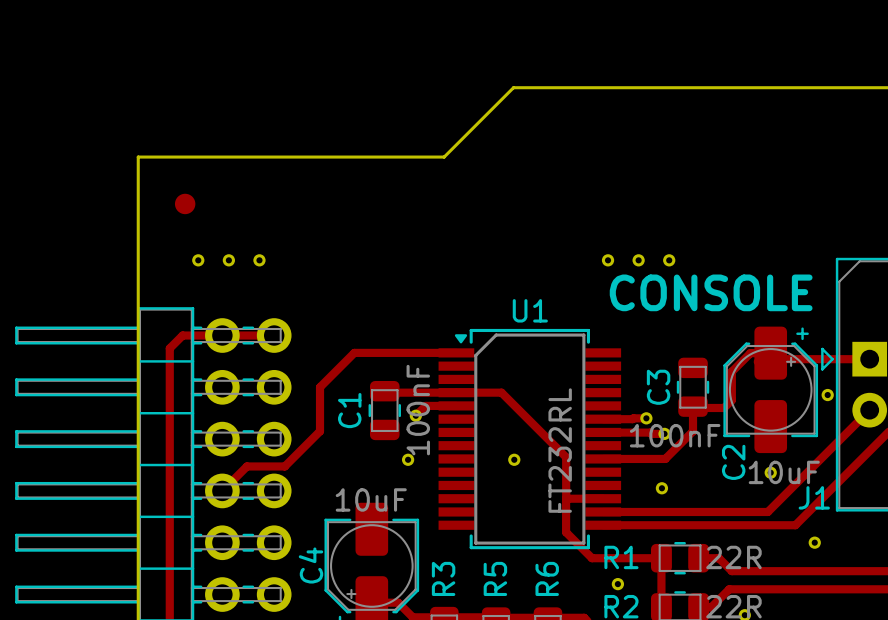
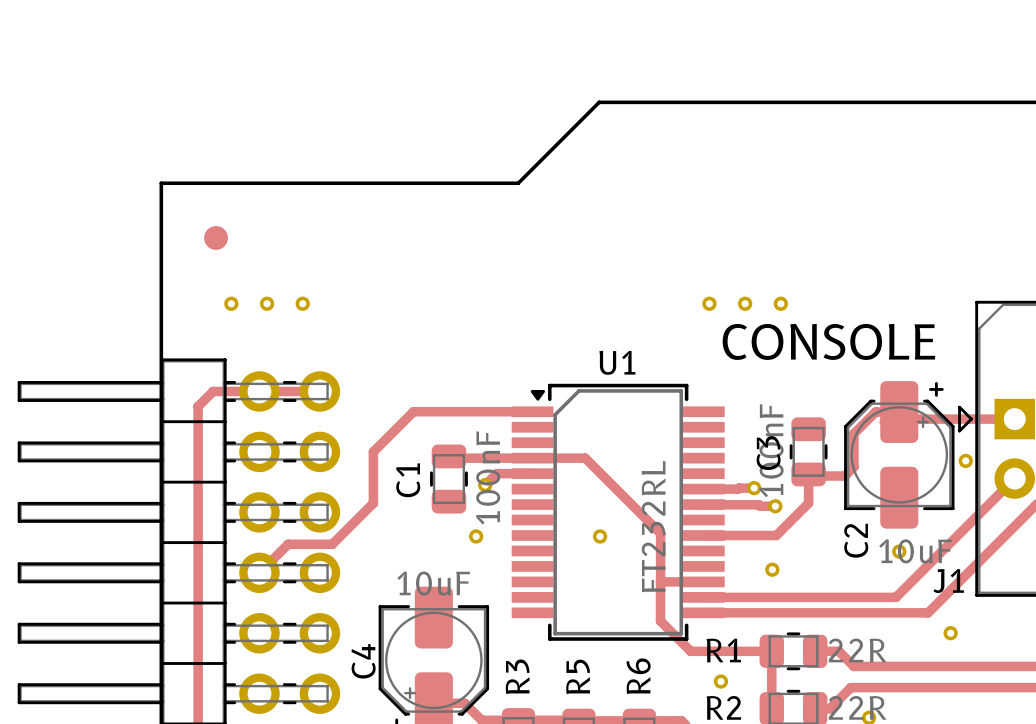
C3 value rotation: 0° (675, 435) -> 90° counterclockwise (771, 450)

